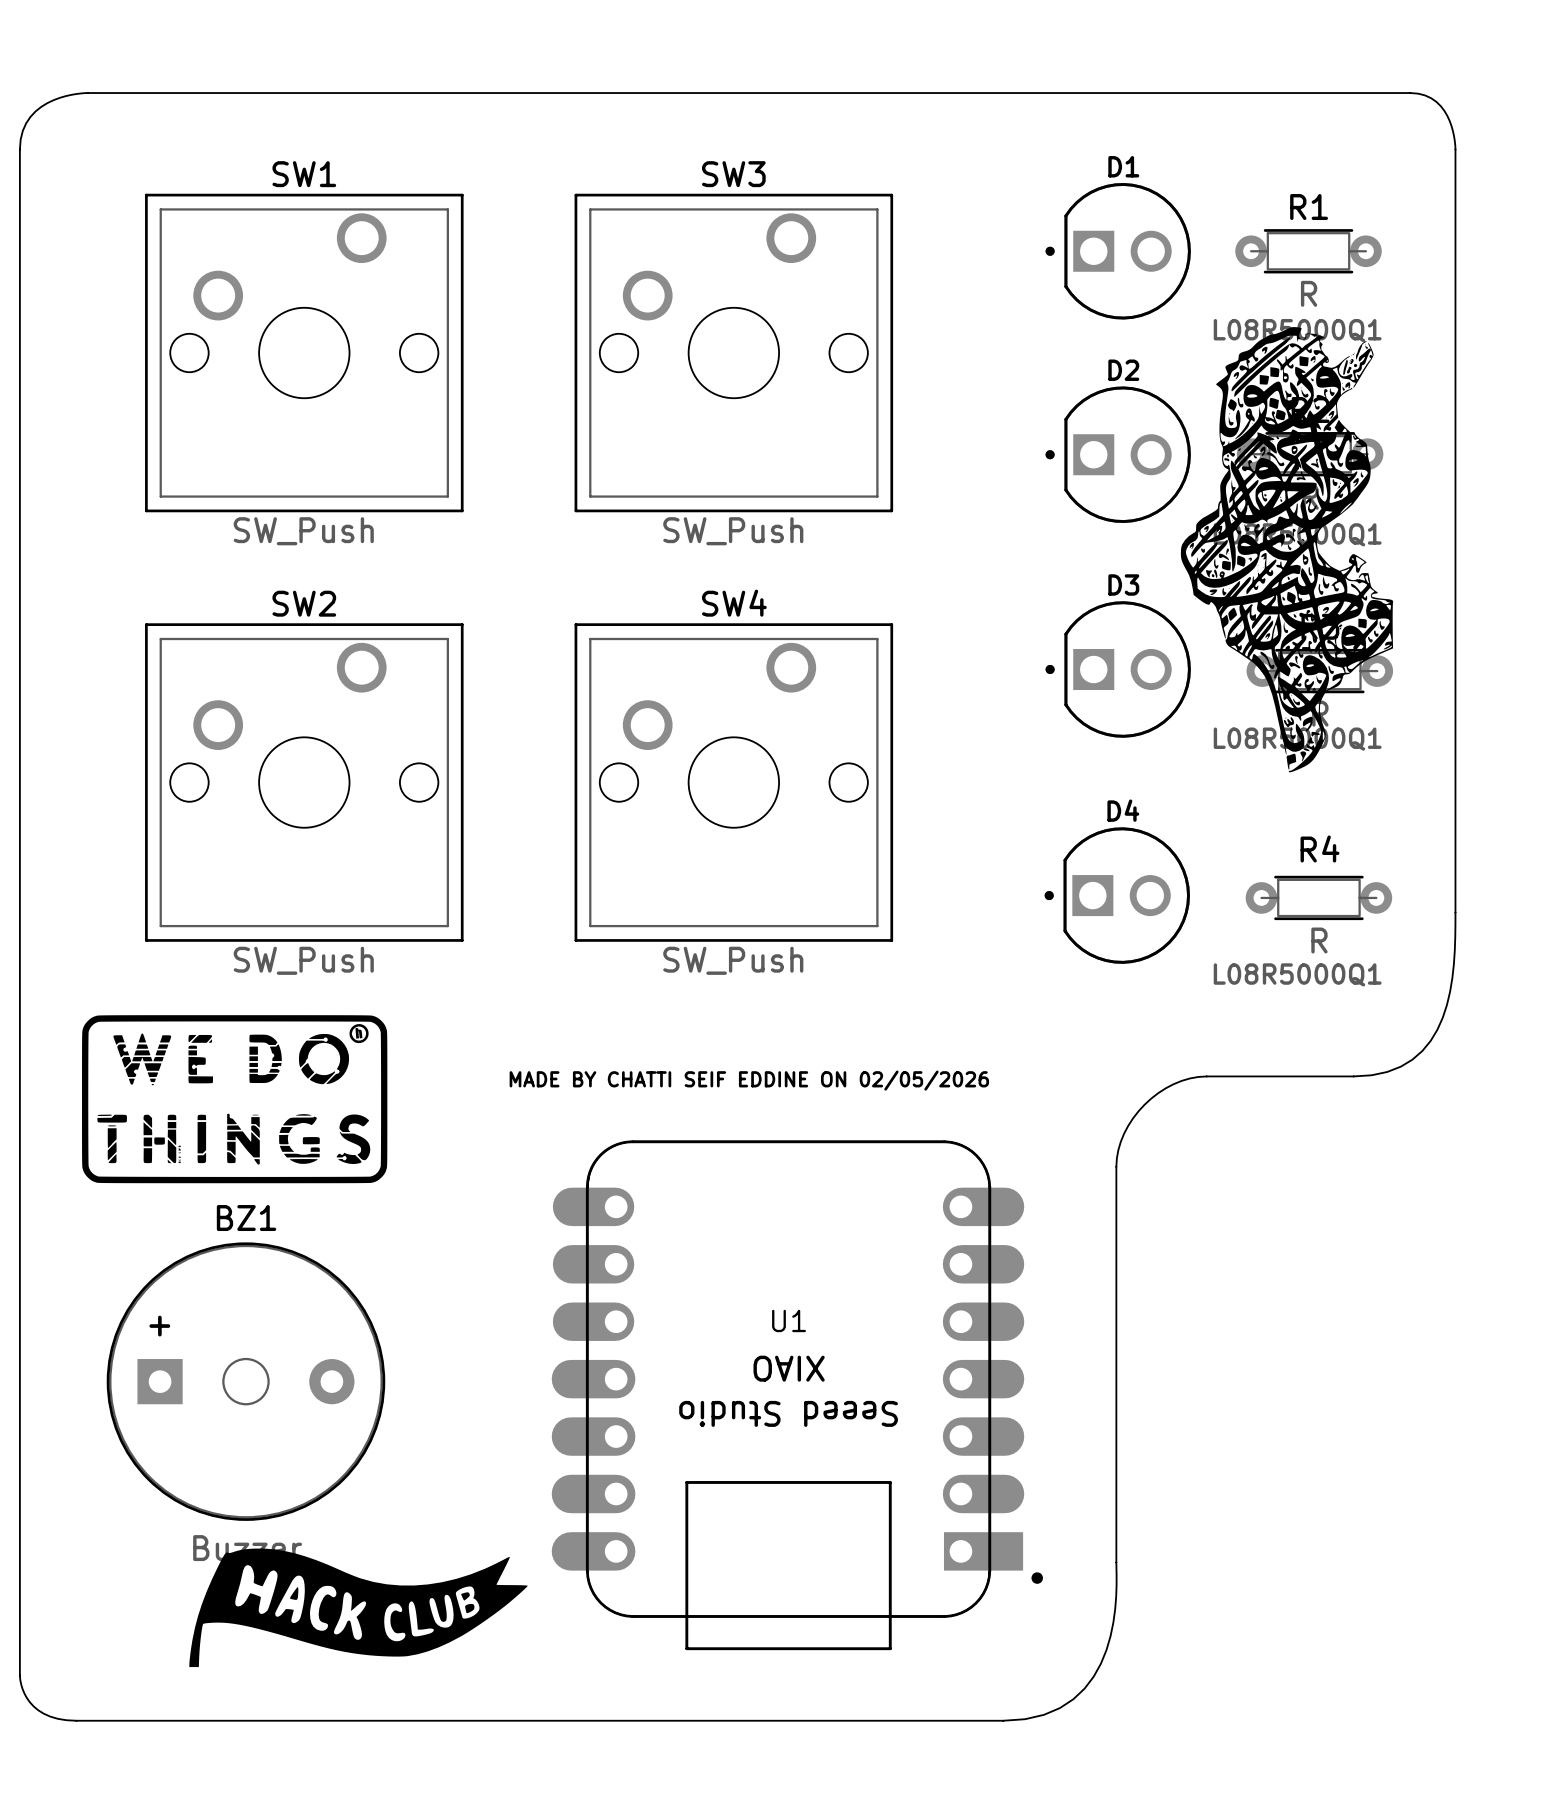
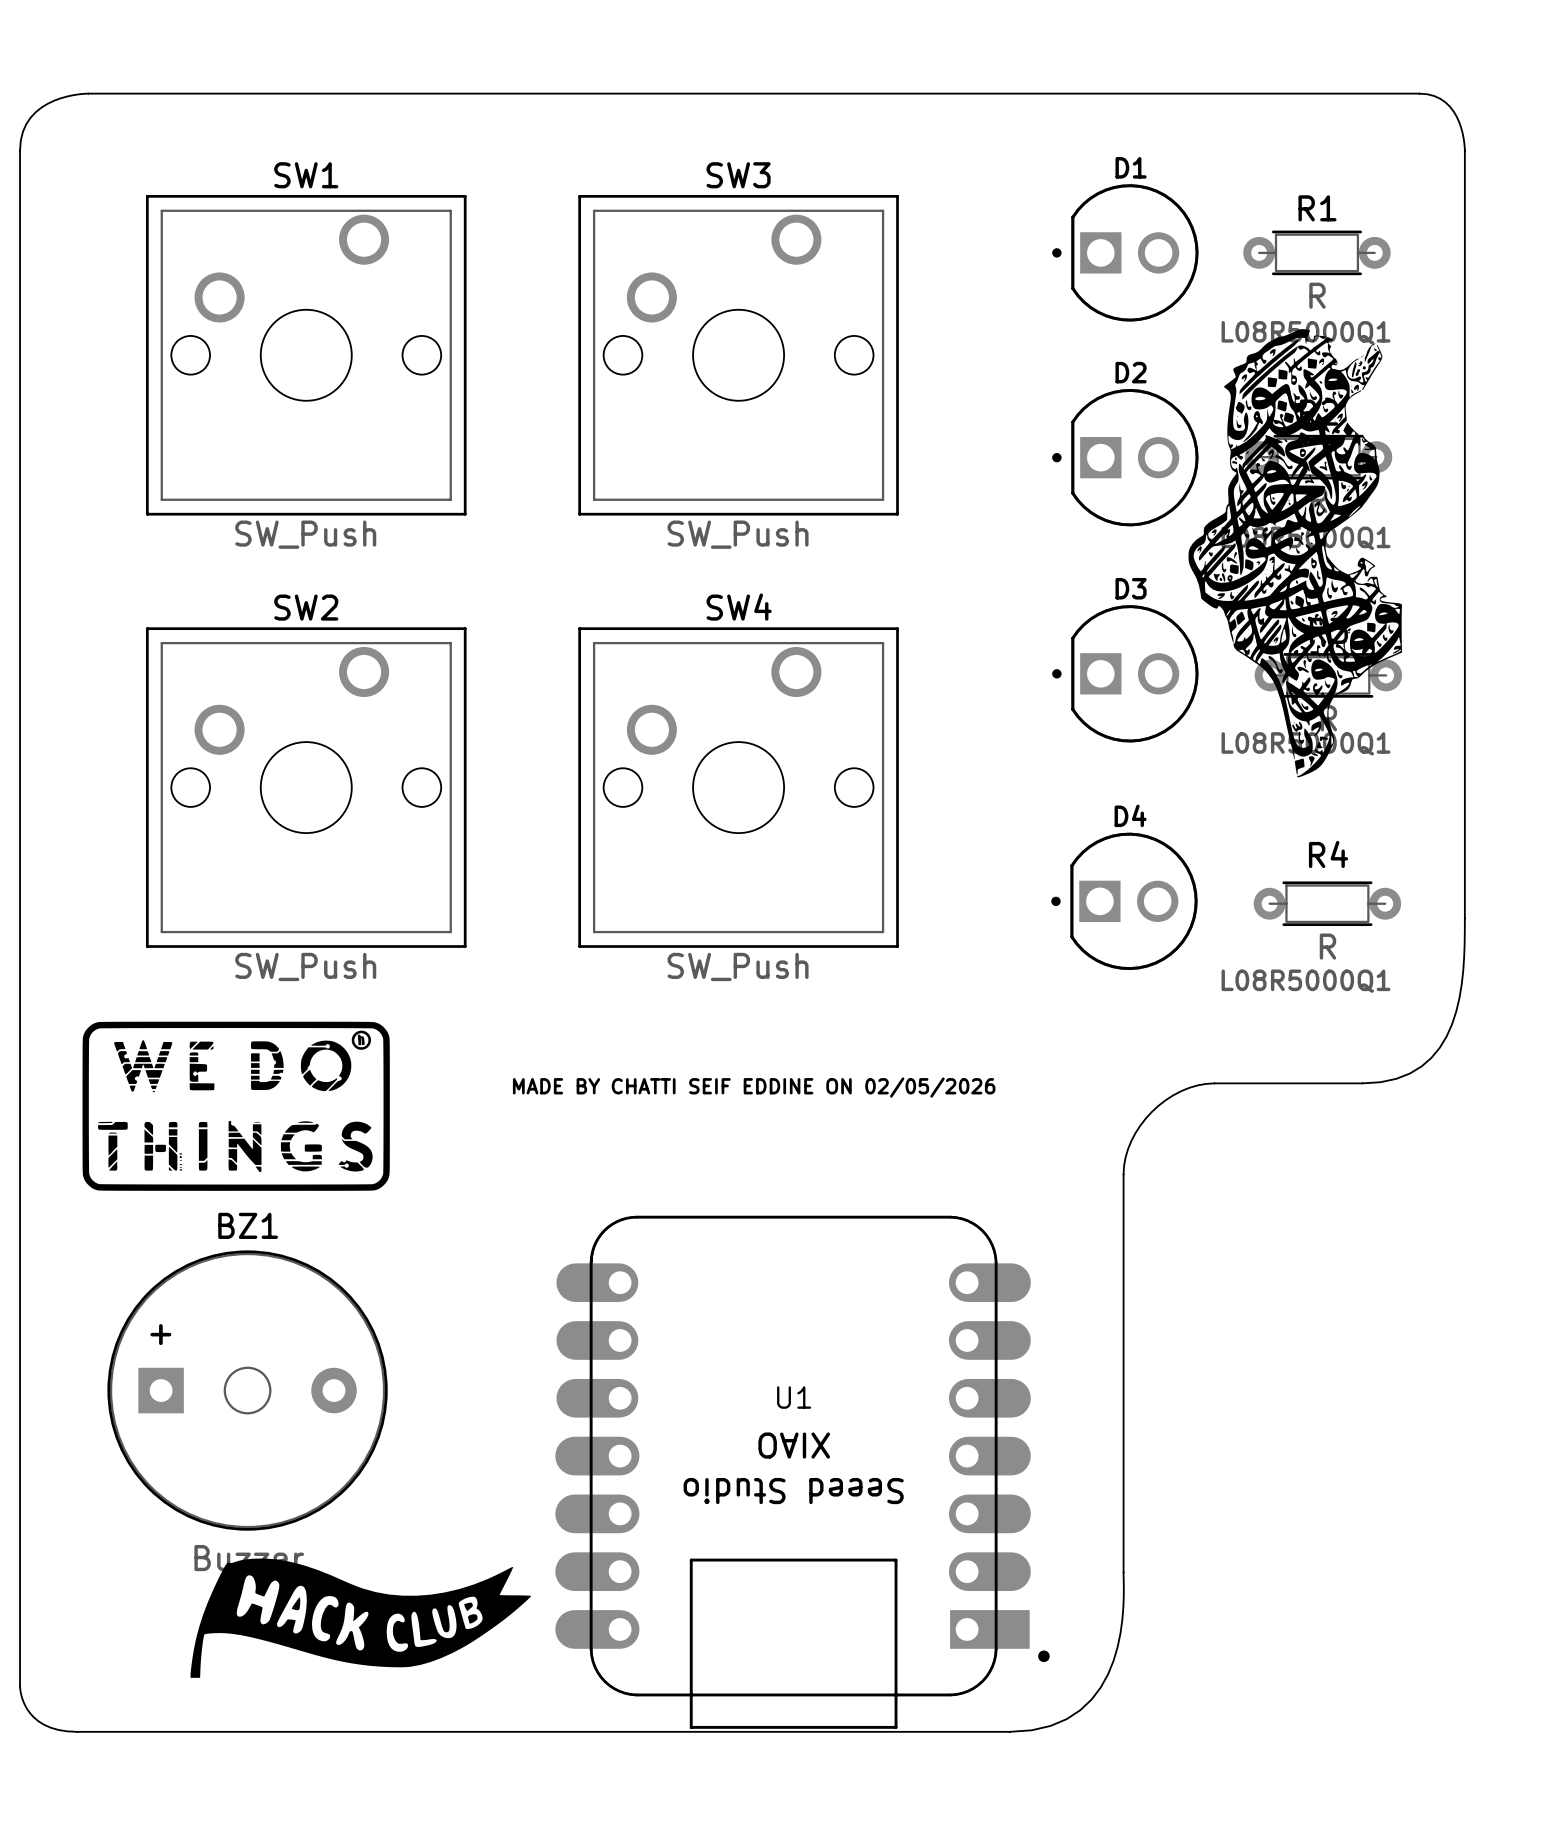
U1 footprint: [551, 1140, 1043, 1651] -> [555, 1215, 1050, 1729]

